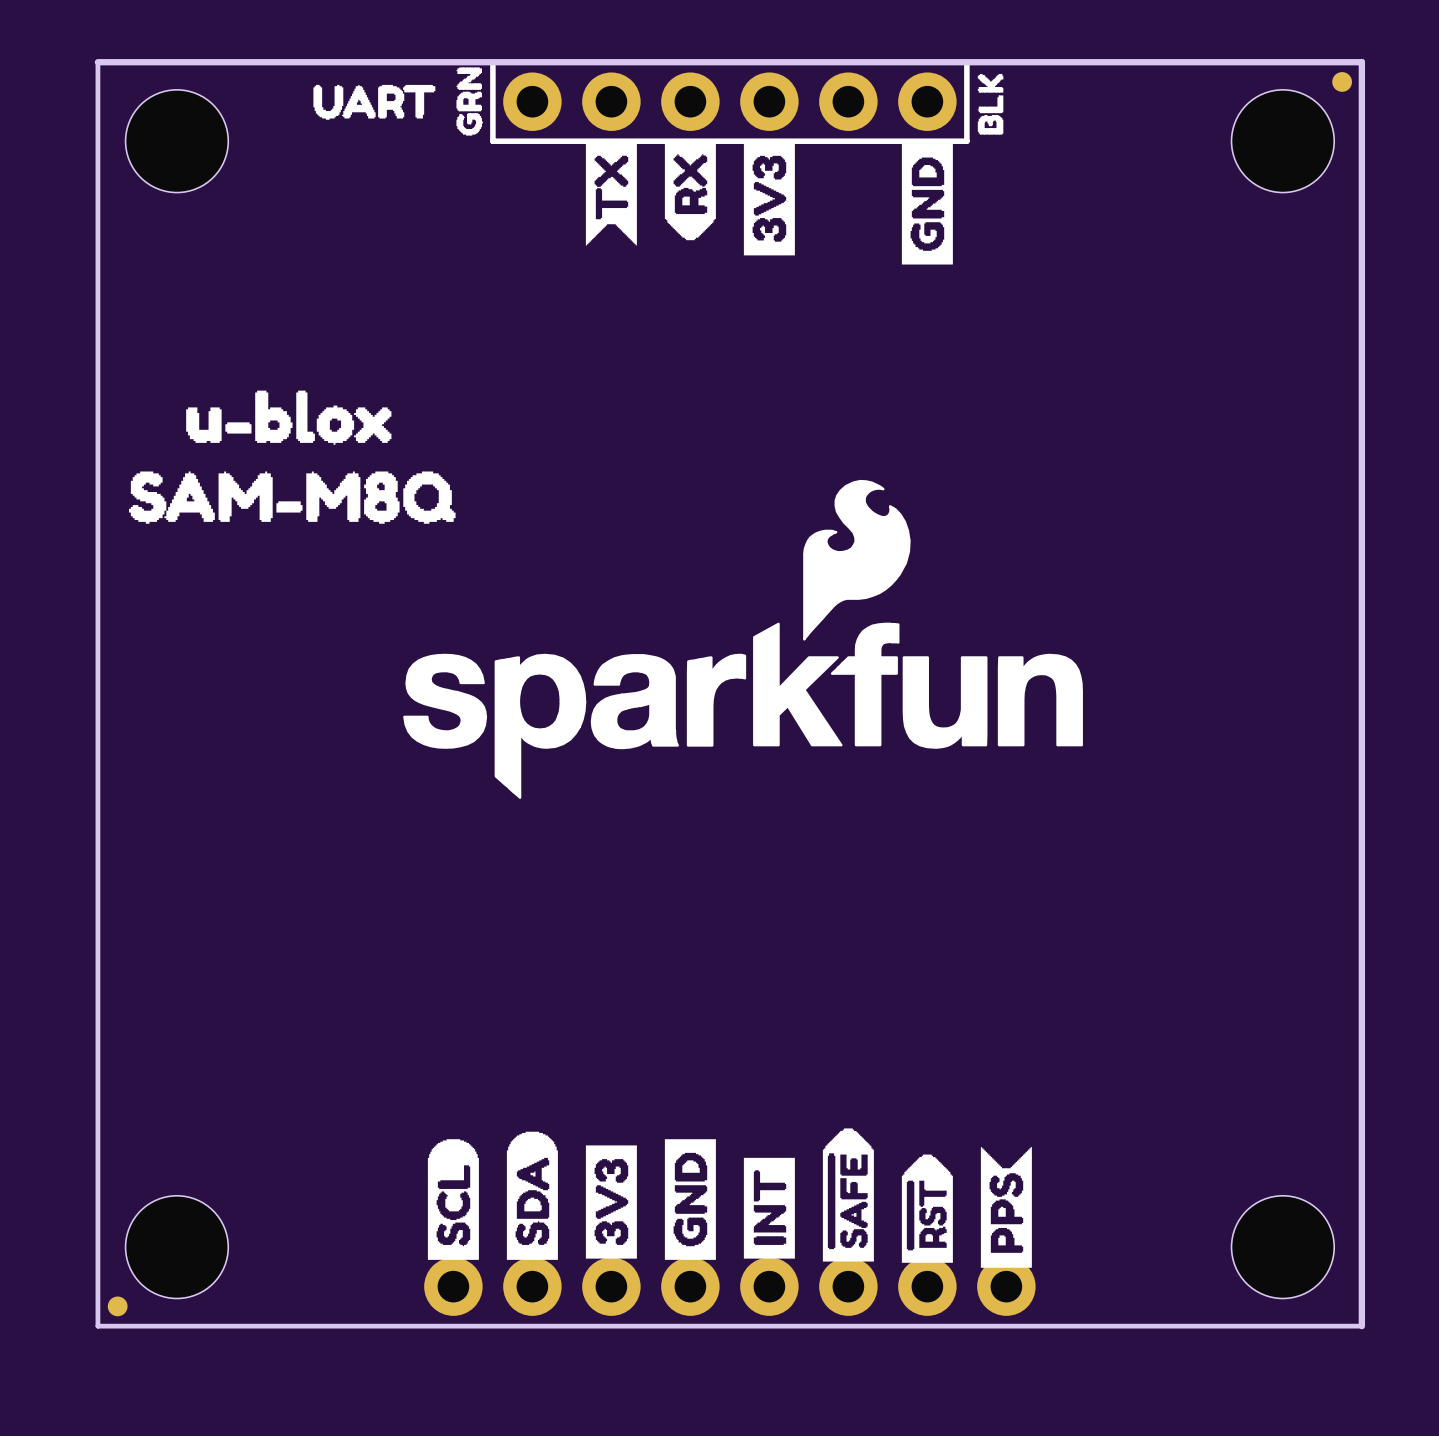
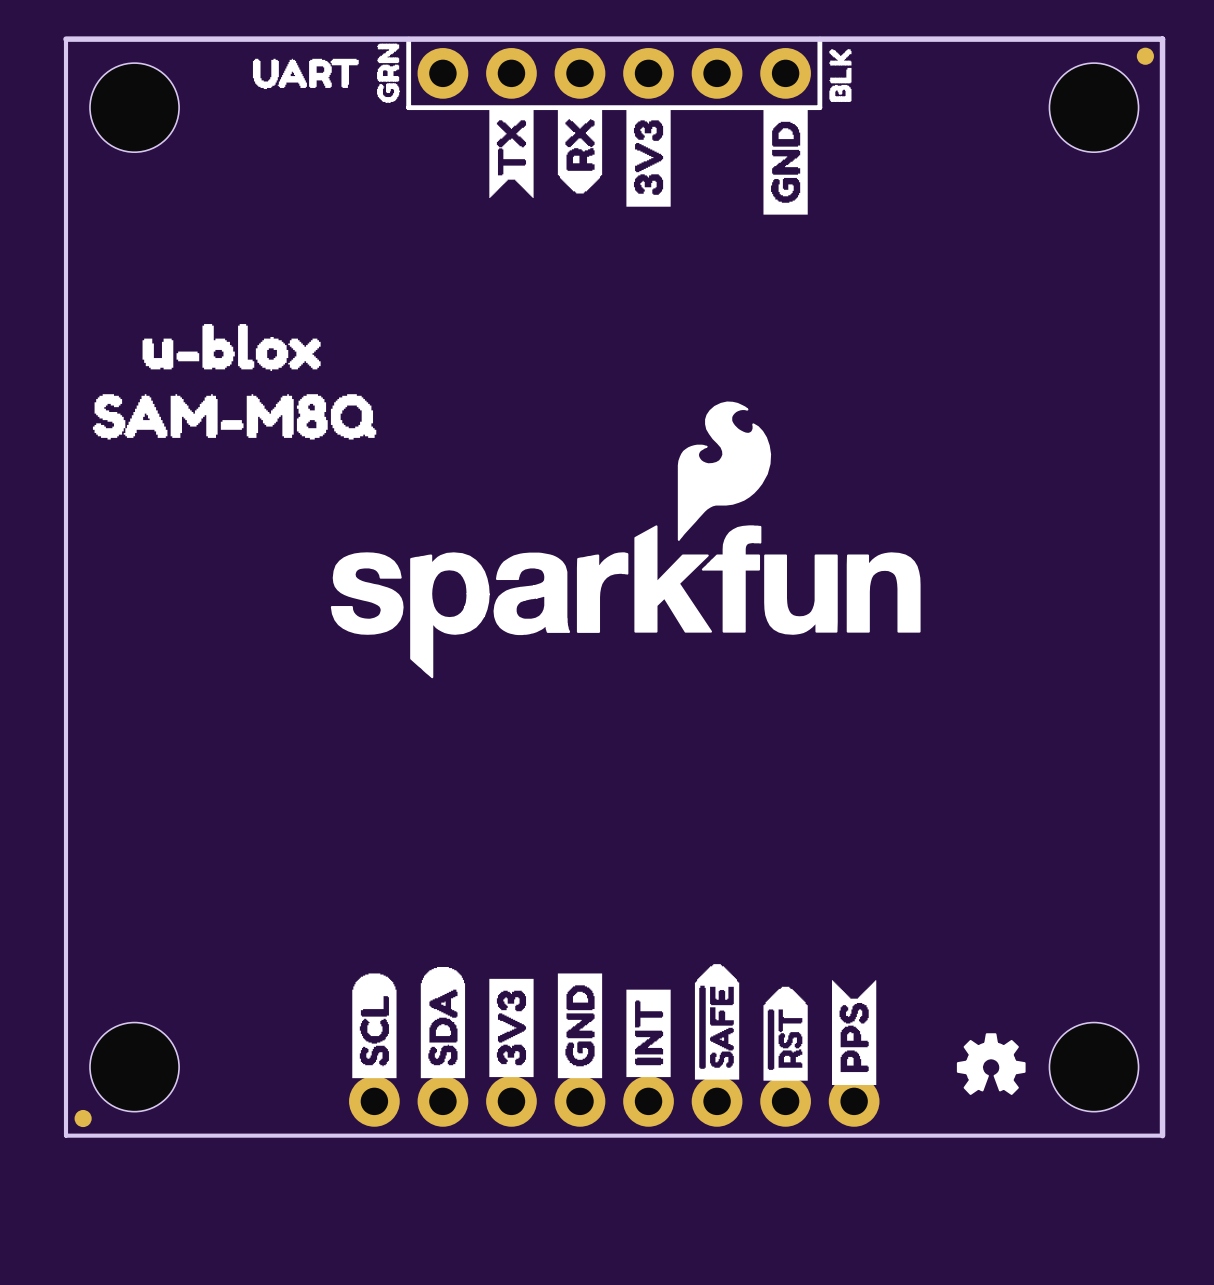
drawing: none -> [956, 1033, 1026, 1095]

